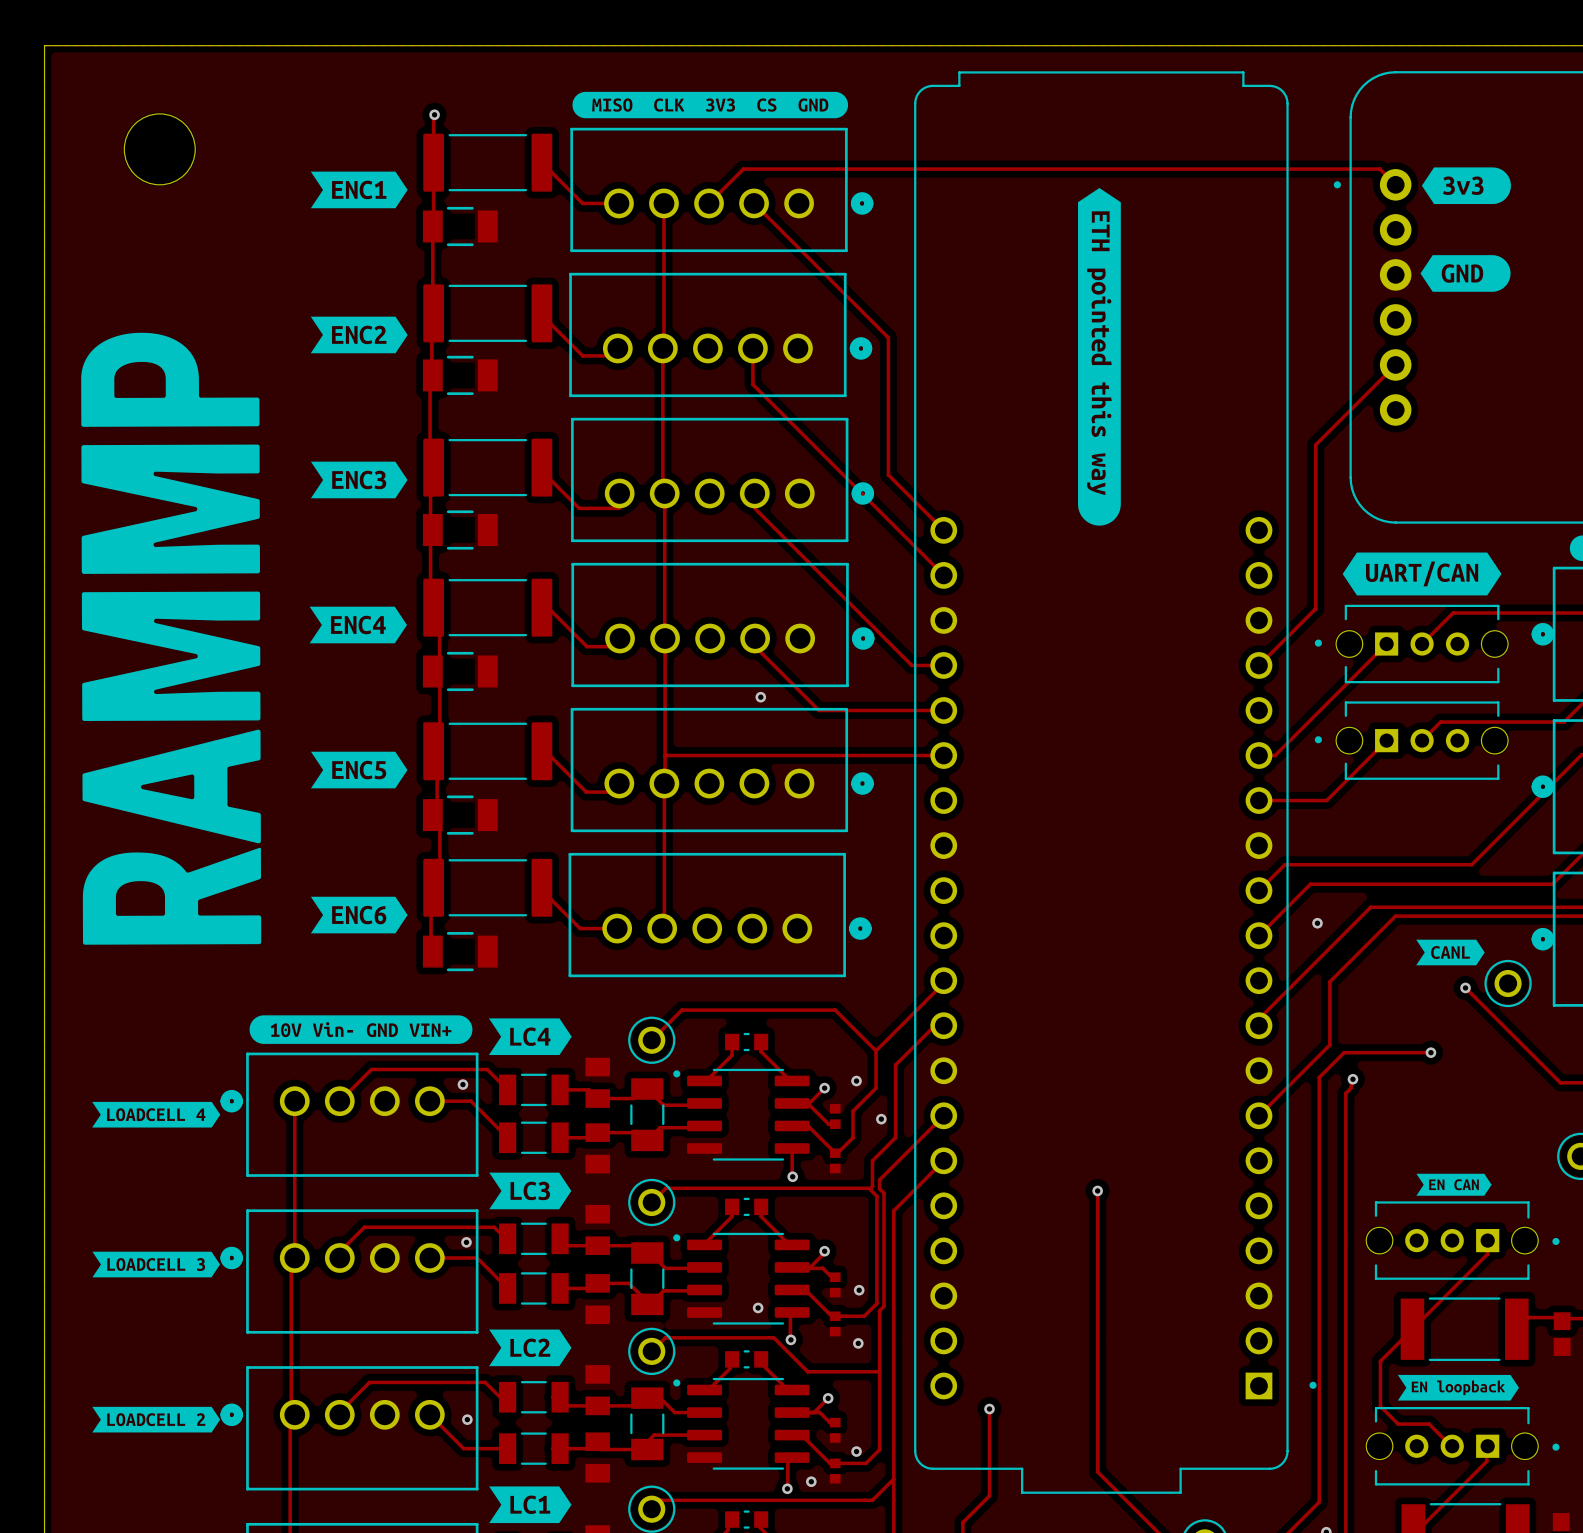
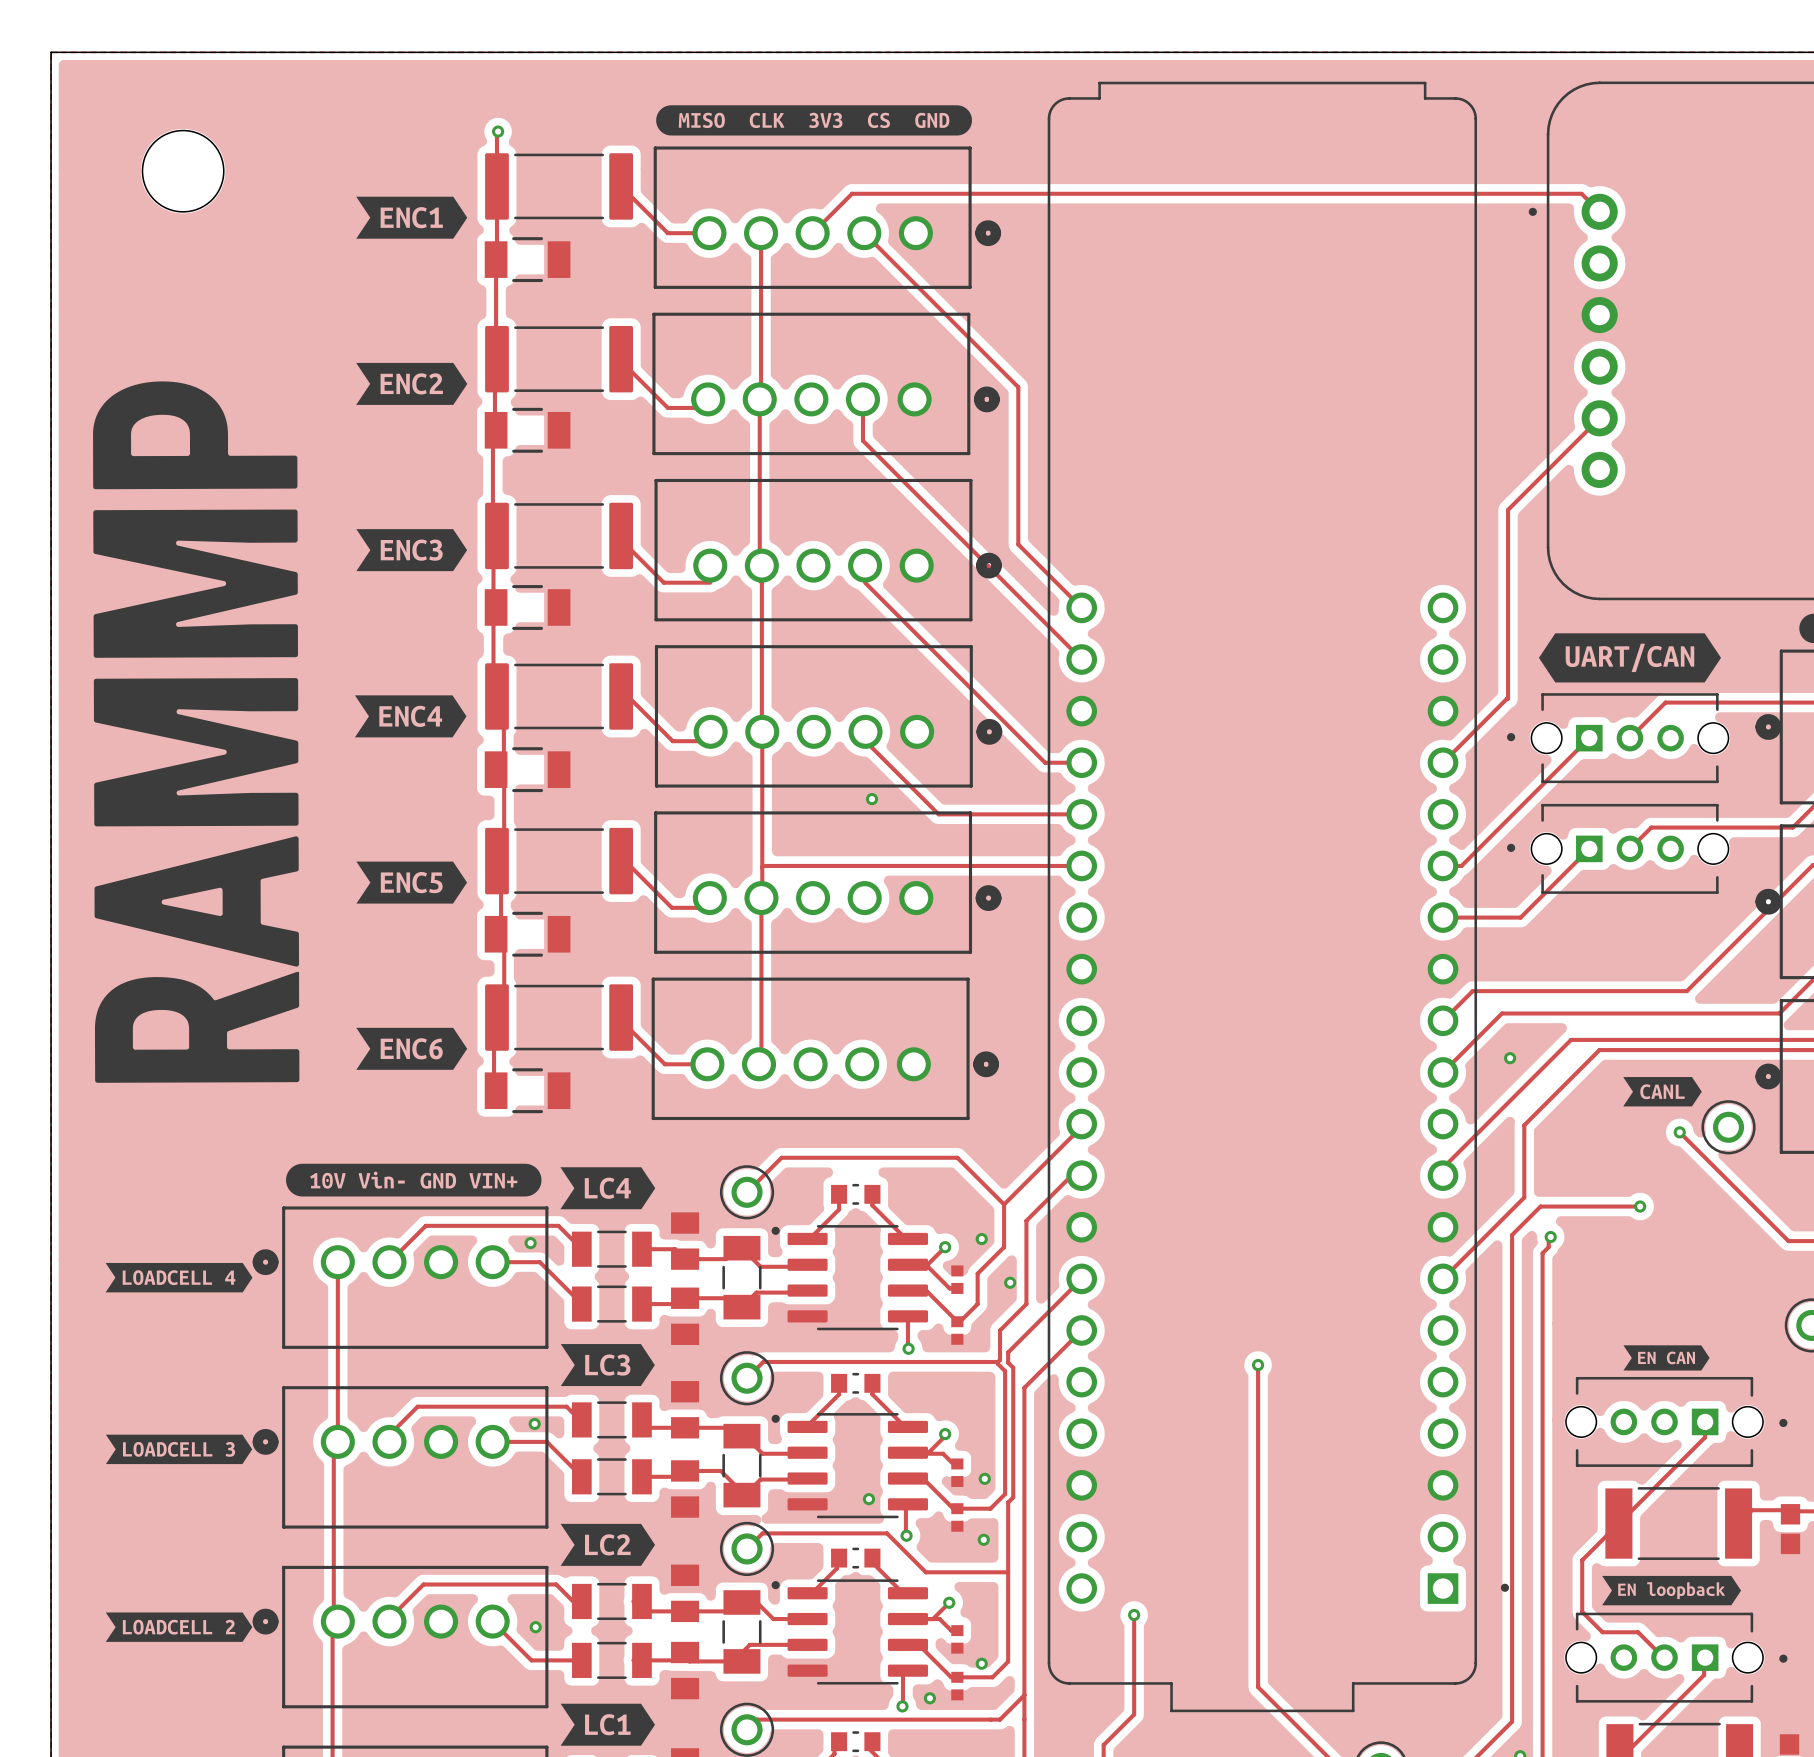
drawing: [1421, 167, 1511, 205] -> none
drawing: [1078, 187, 1121, 526] -> none
drawing: [1420, 255, 1511, 292] -> none

